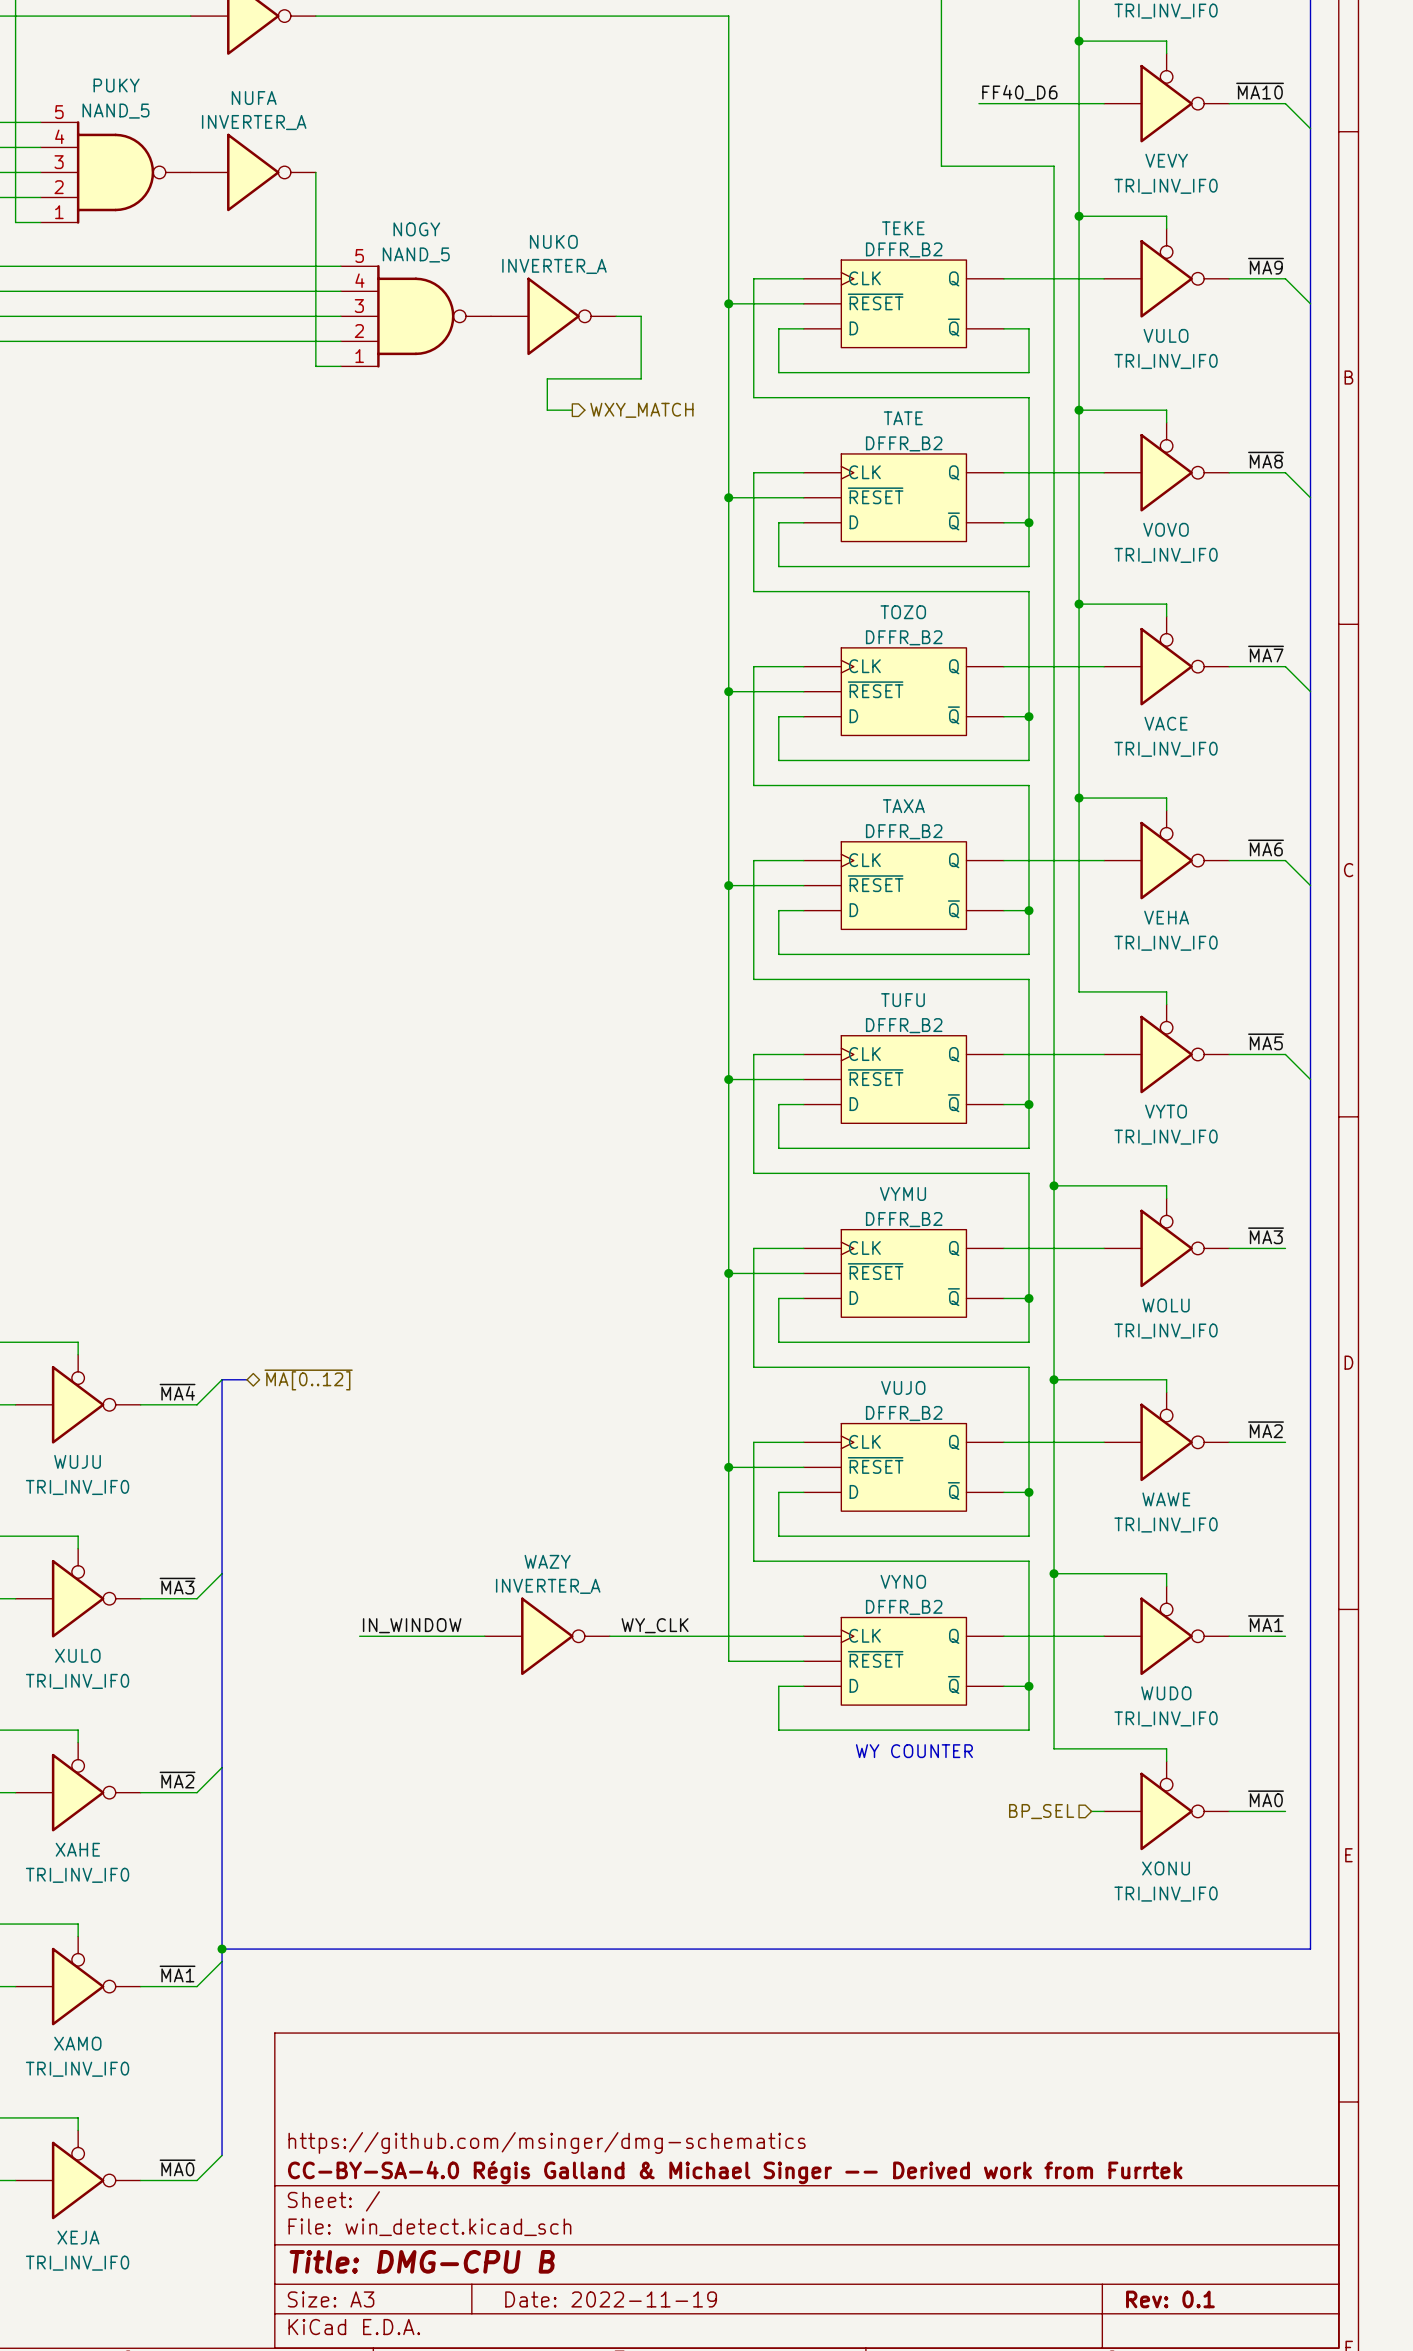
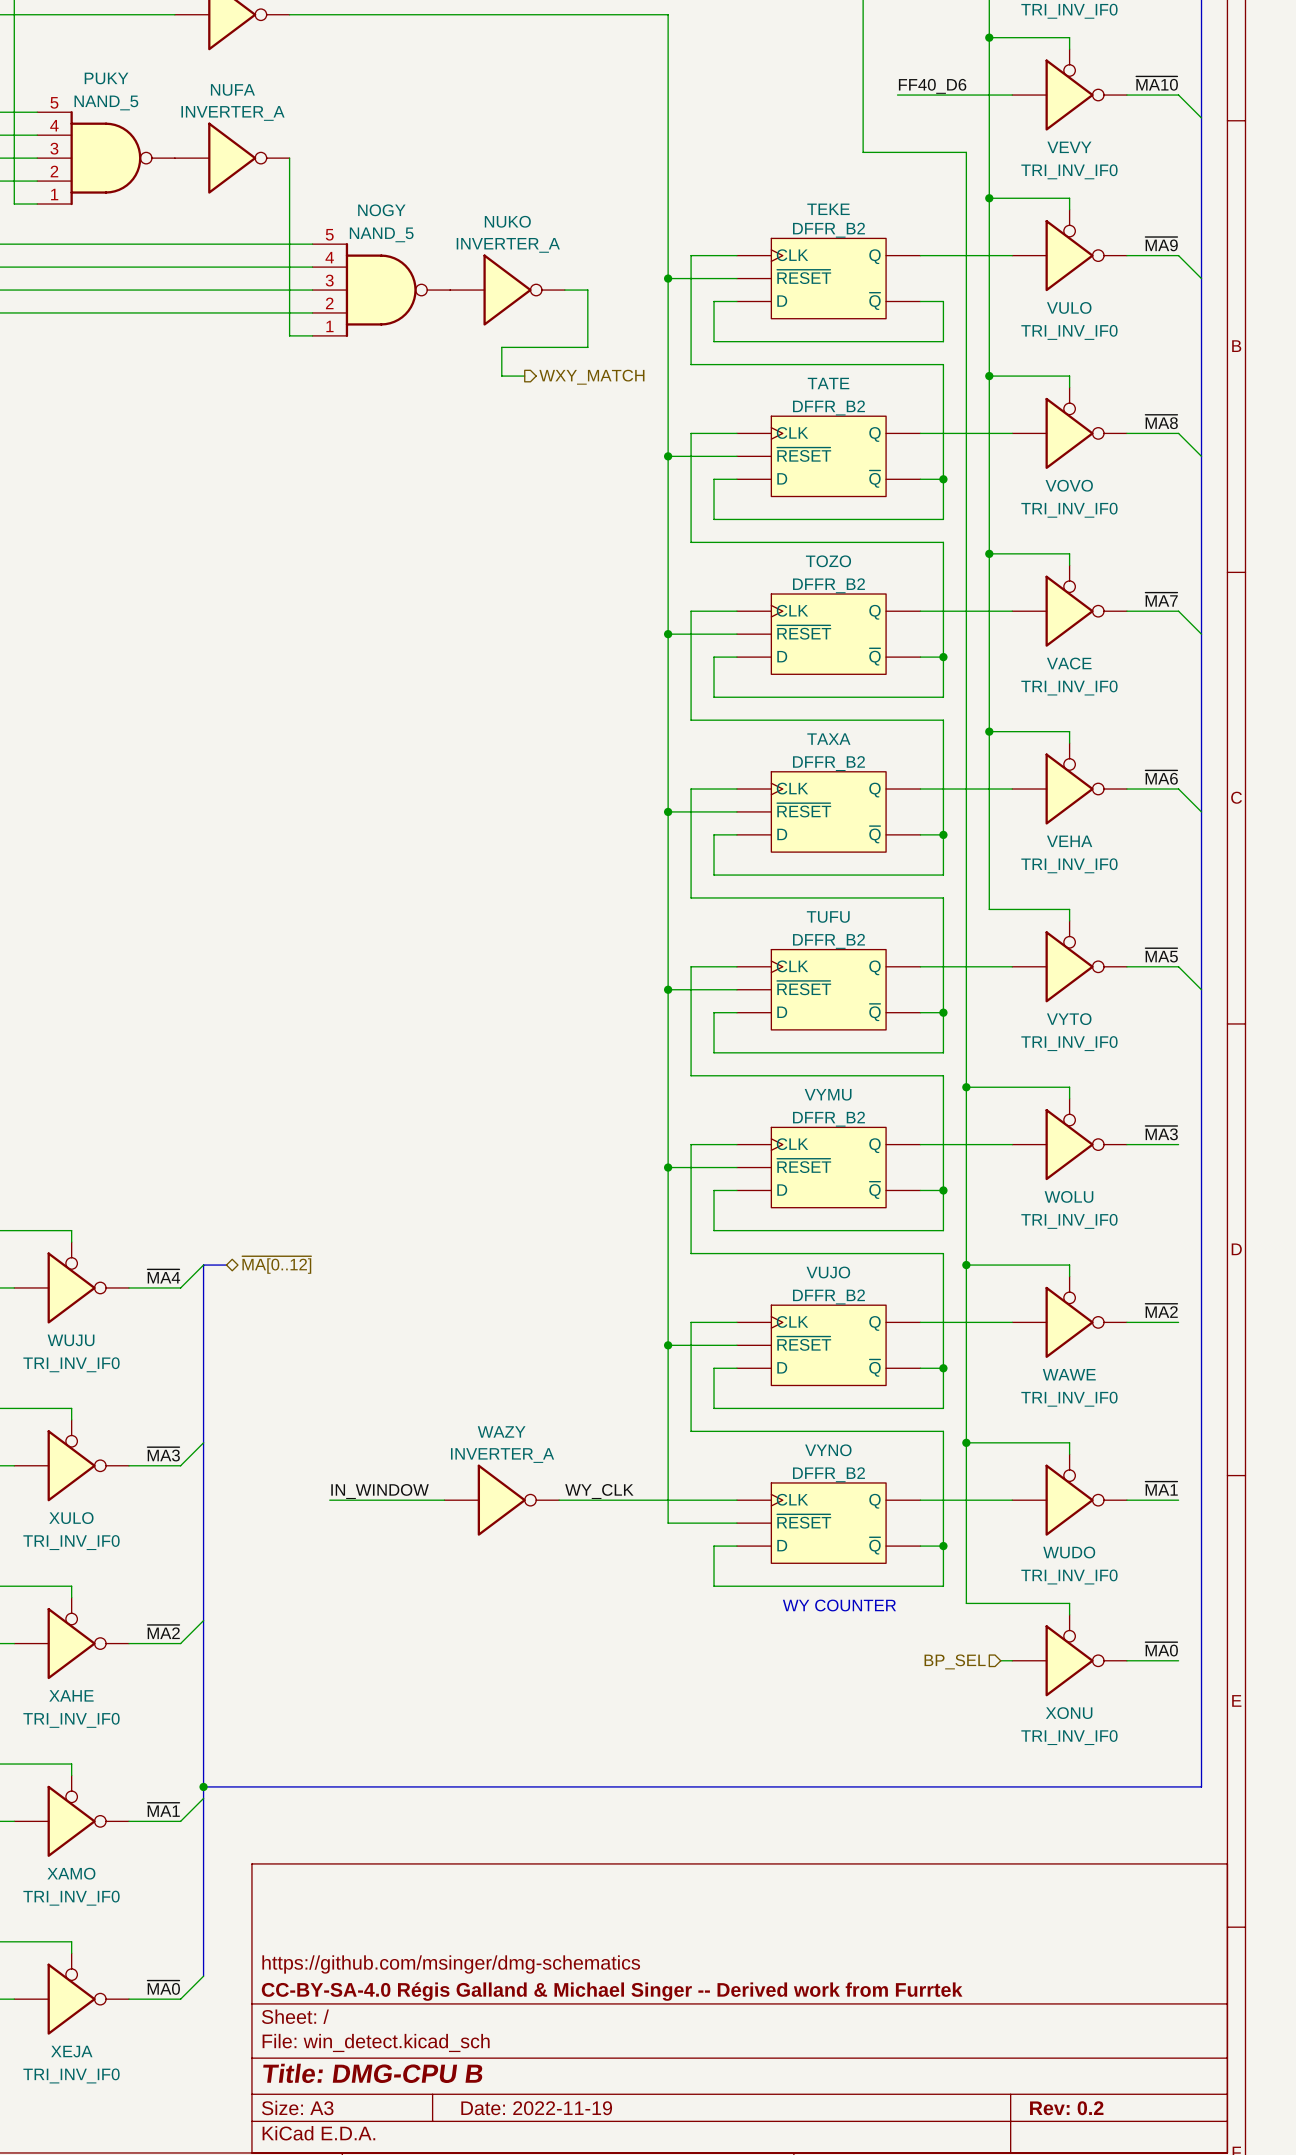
title block: Rev: 0.1 (1170, 2299) -> Rev: 0.2 (1066, 2108)

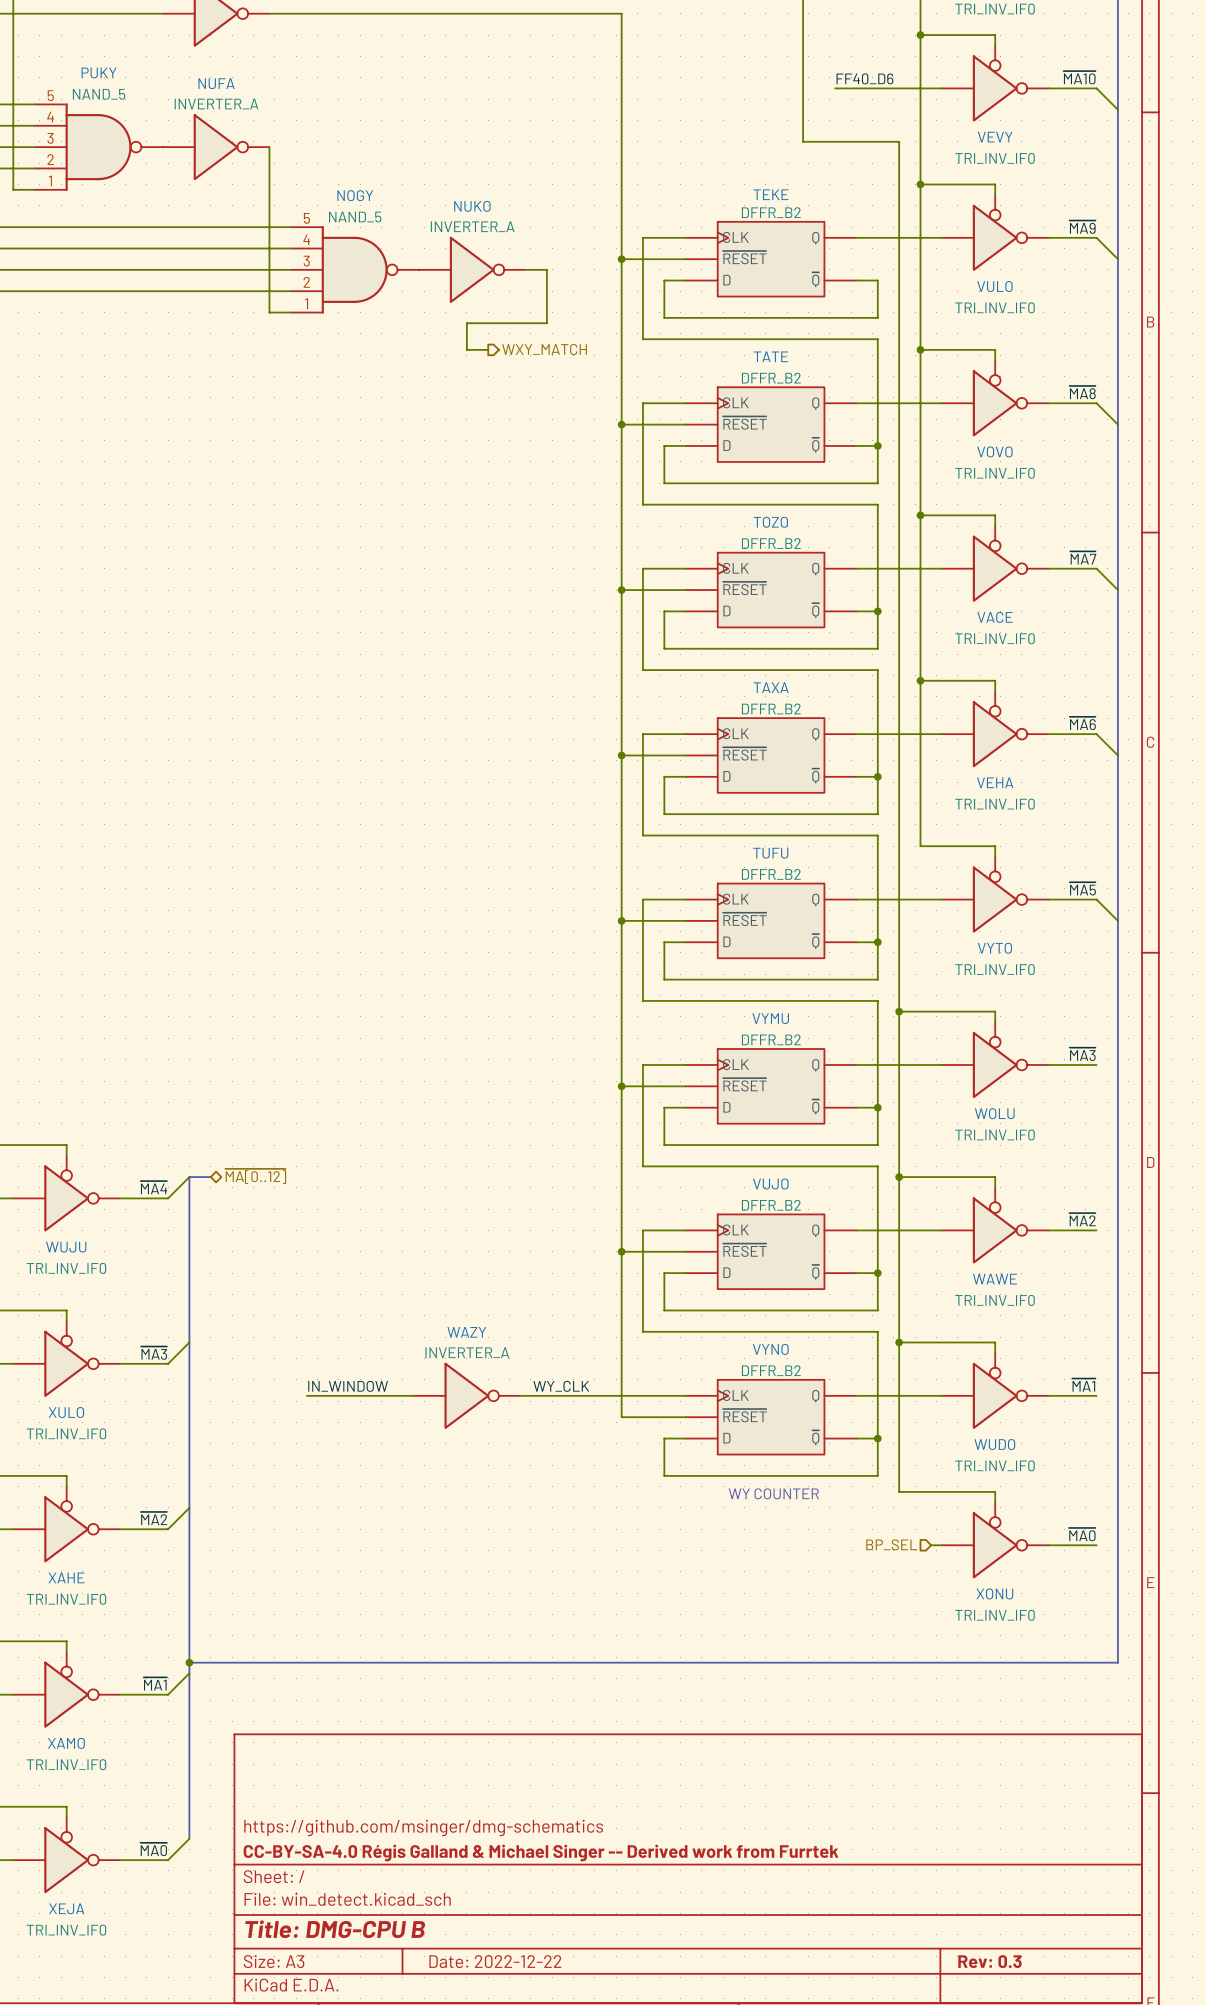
title block: Date: 2022-11-19 (536, 2108) -> Date: 2022-12-22 (495, 1961)
title block: Rev: 0.2 (1066, 2108) -> Rev: 0.3 (989, 1961)

